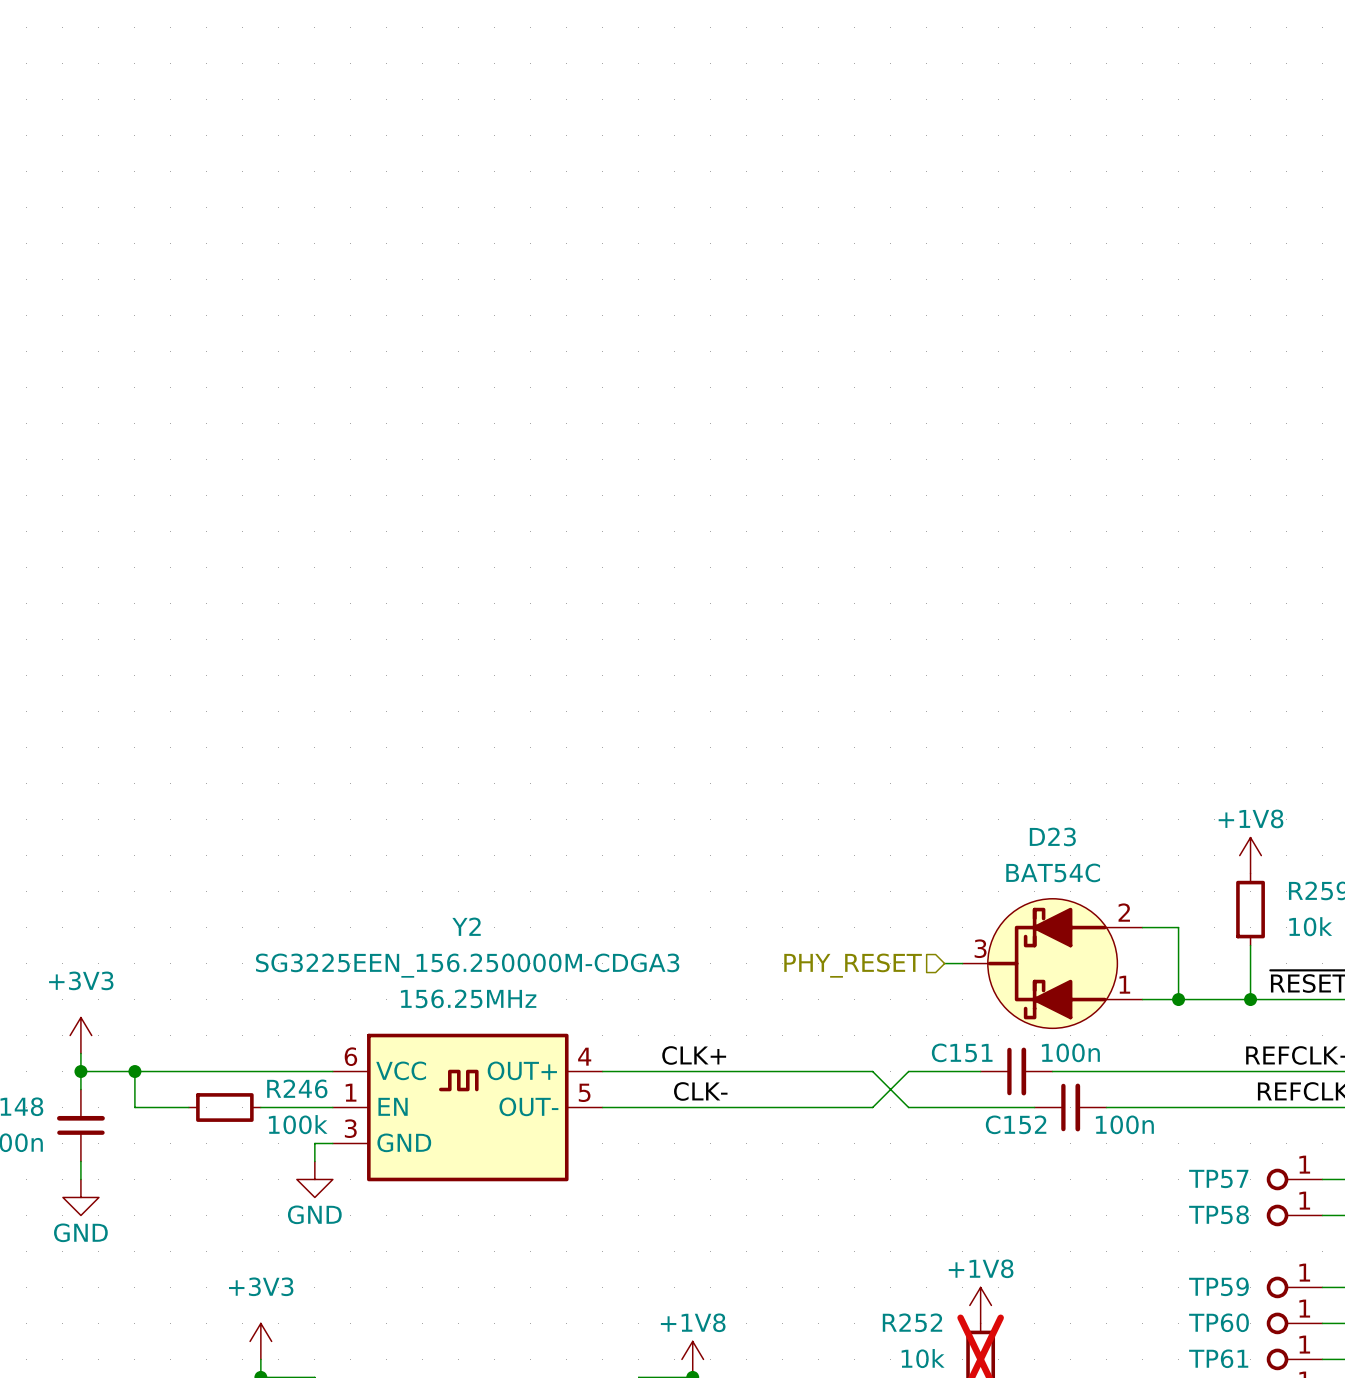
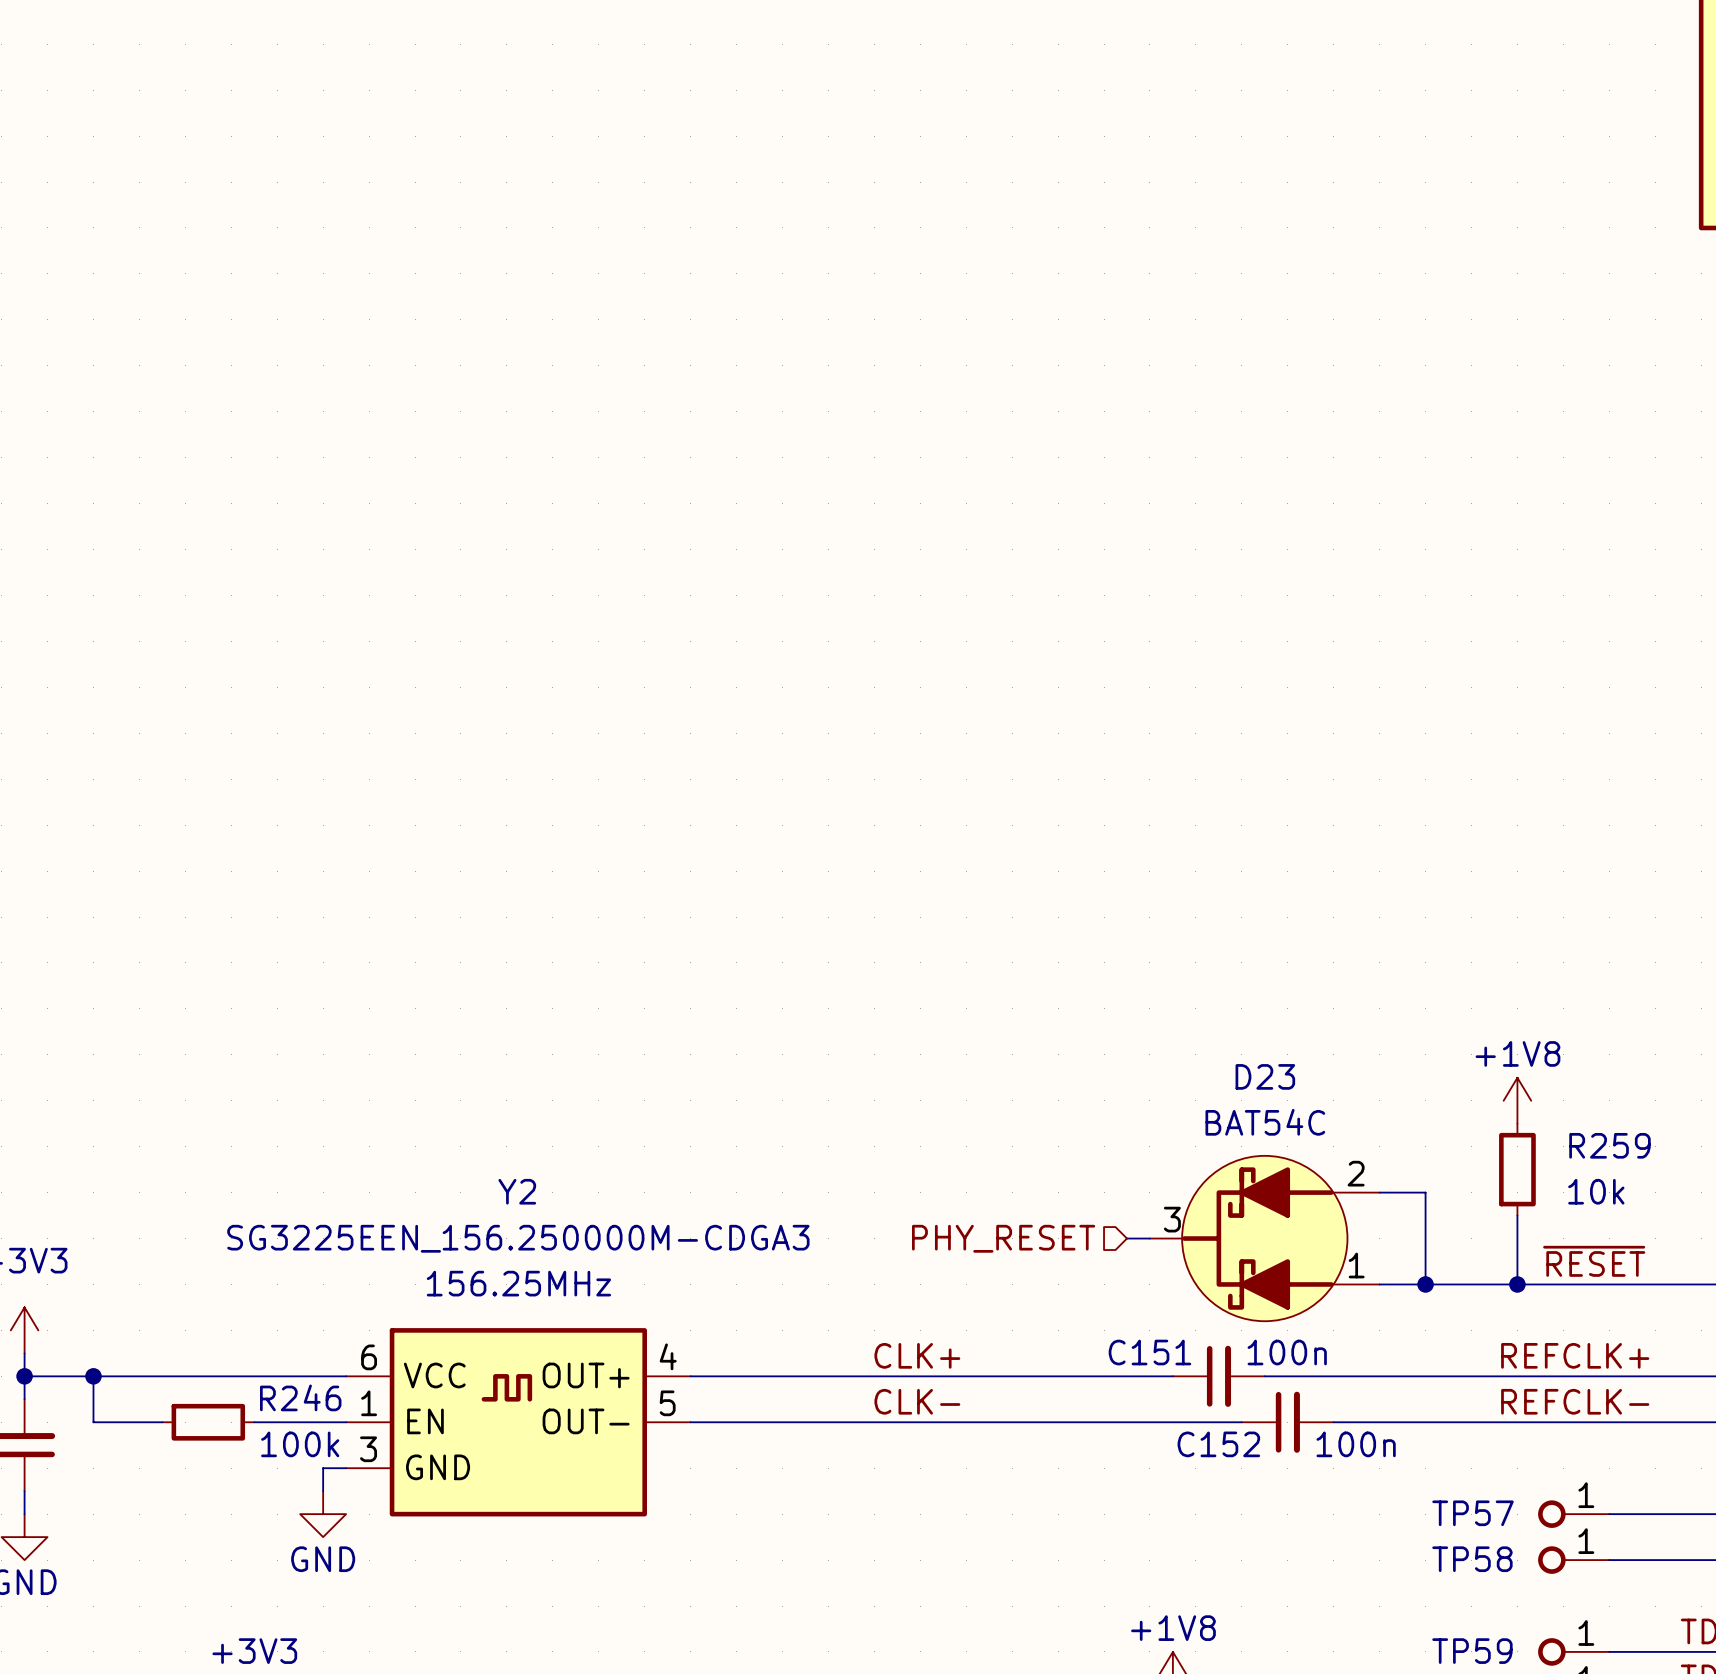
label position: CLK+ (694, 1055) -> CLK+ (917, 1355)
wire: (872, 1071) (908, 1107) -> (1035, 1376) (1081, 1376)
wire: (908, 1071) (872, 1107) -> (1081, 1422) (1035, 1422)
label position: CLK- (700, 1091) -> CLK- (917, 1401)

